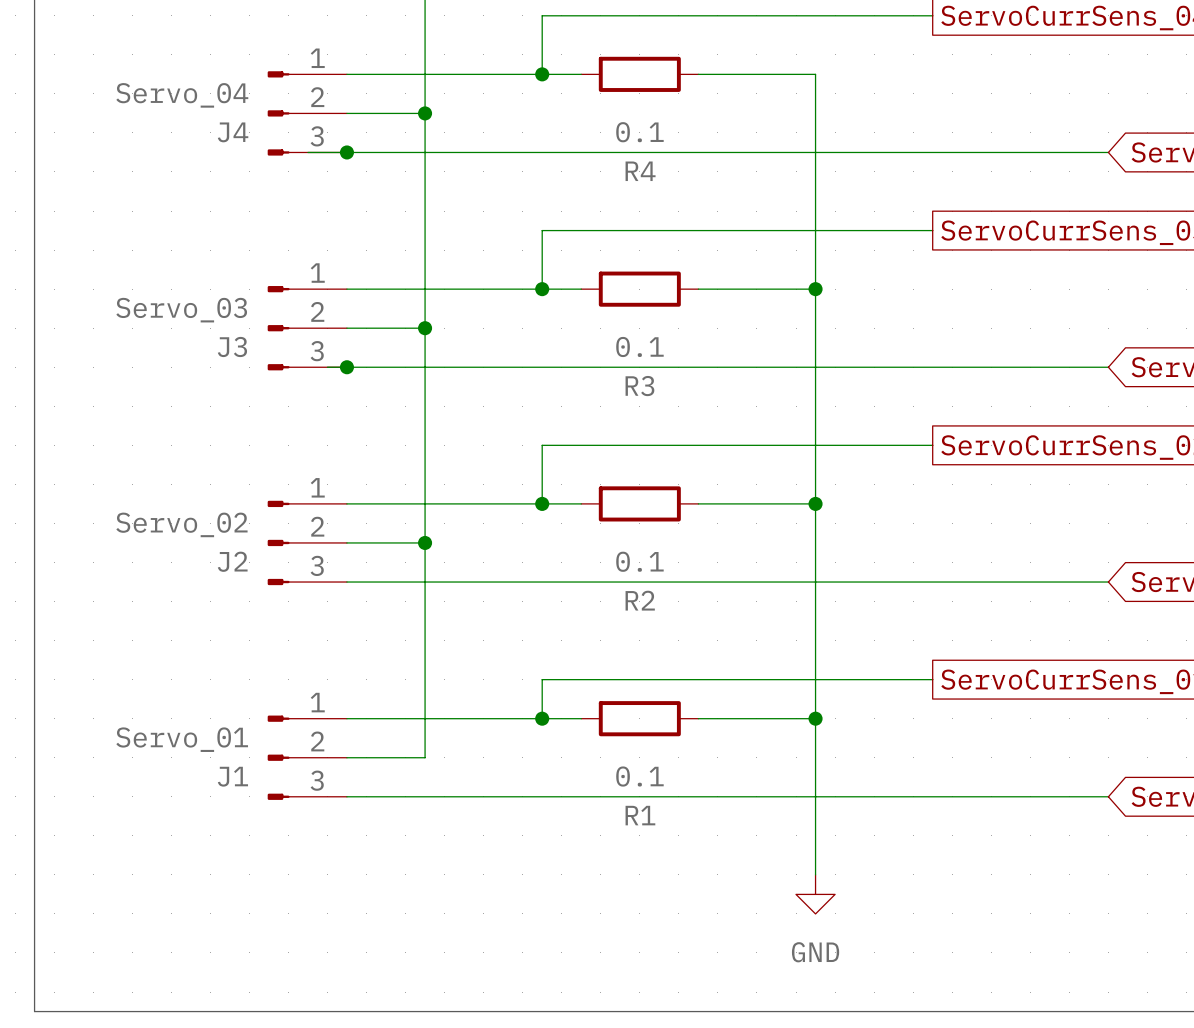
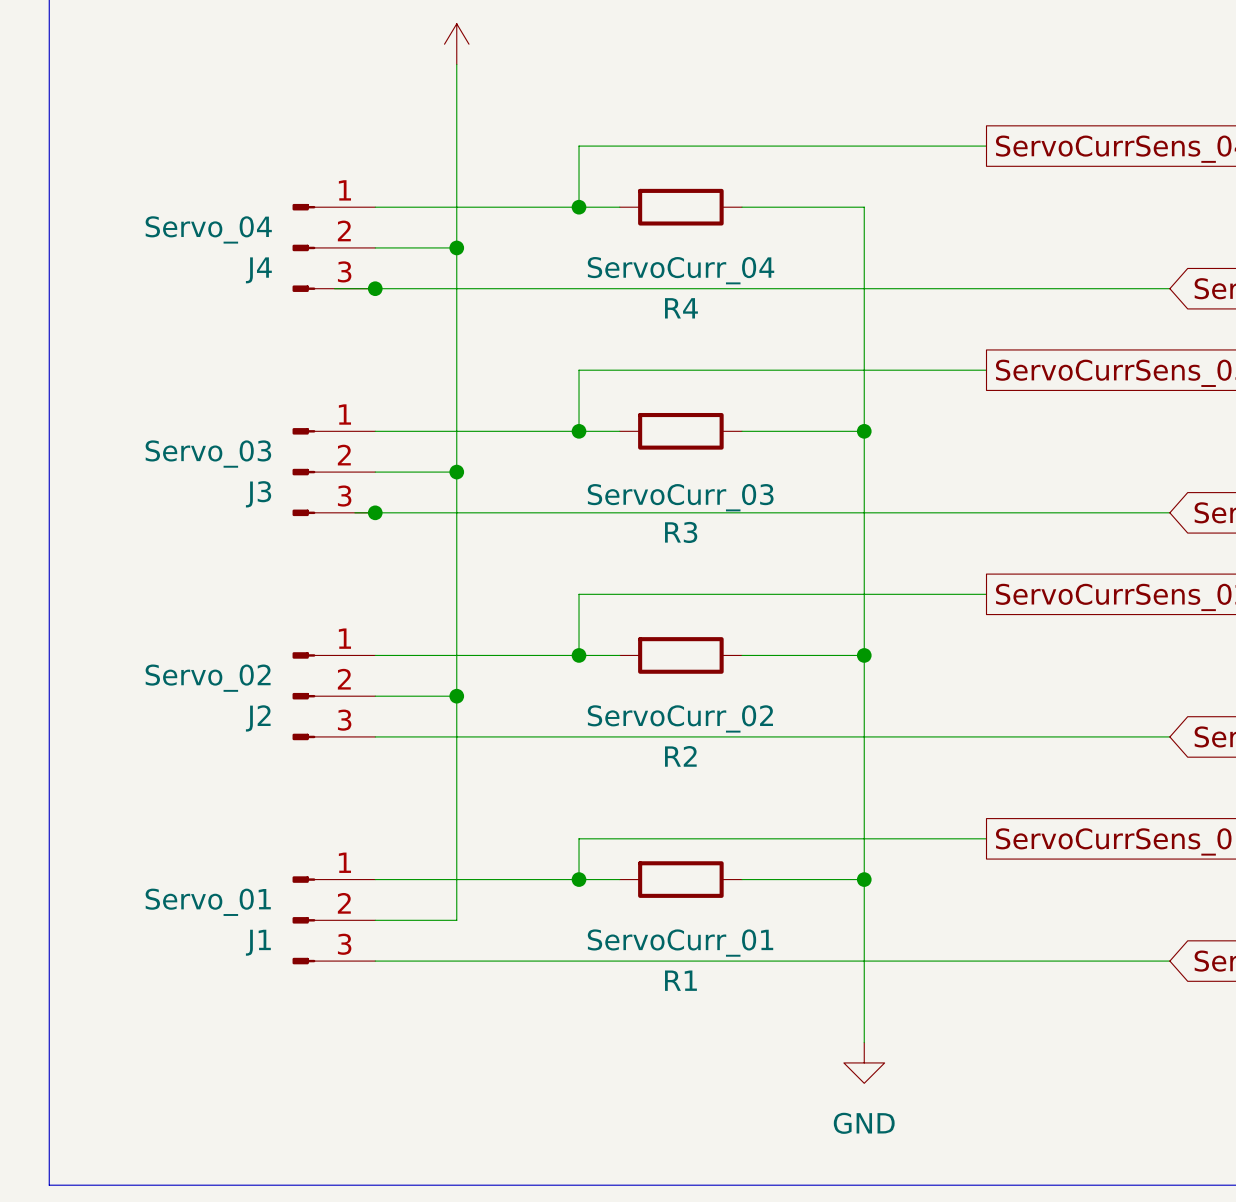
R4 value: 0.1 (639, 132) -> ServoCurr_04 (681, 270)
R3 value: 0.1 (639, 346) -> ServoCurr_03 (680, 497)
R2 value: 0.1 (639, 561) -> ServoCurr_02 (680, 718)
R1 value: 0.1 (639, 776) -> ServoCurr_01 (680, 943)

